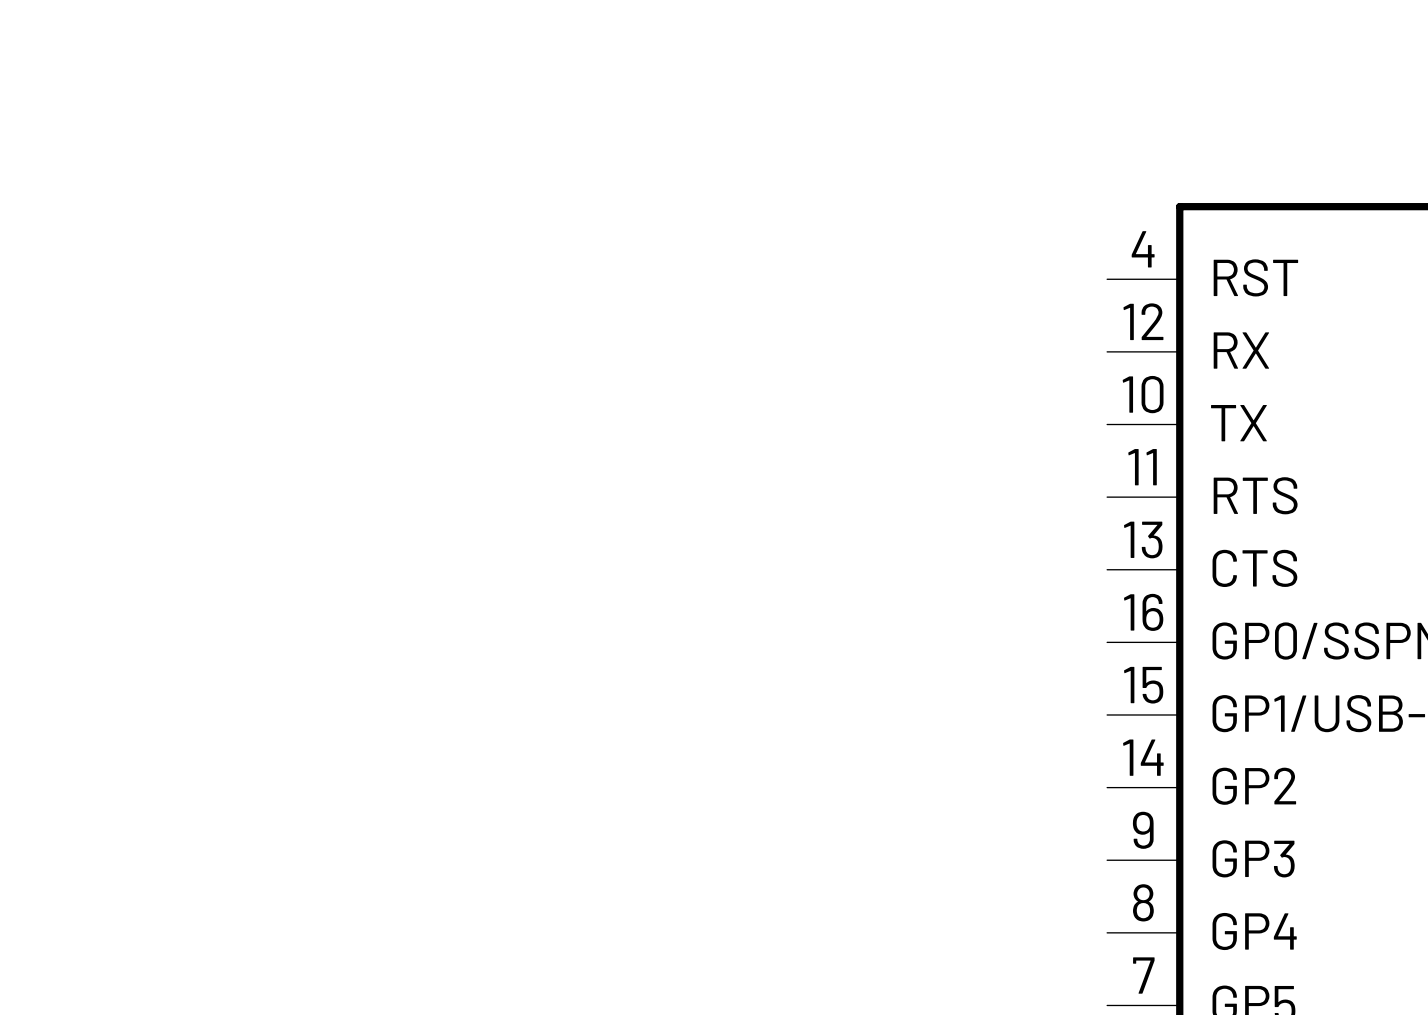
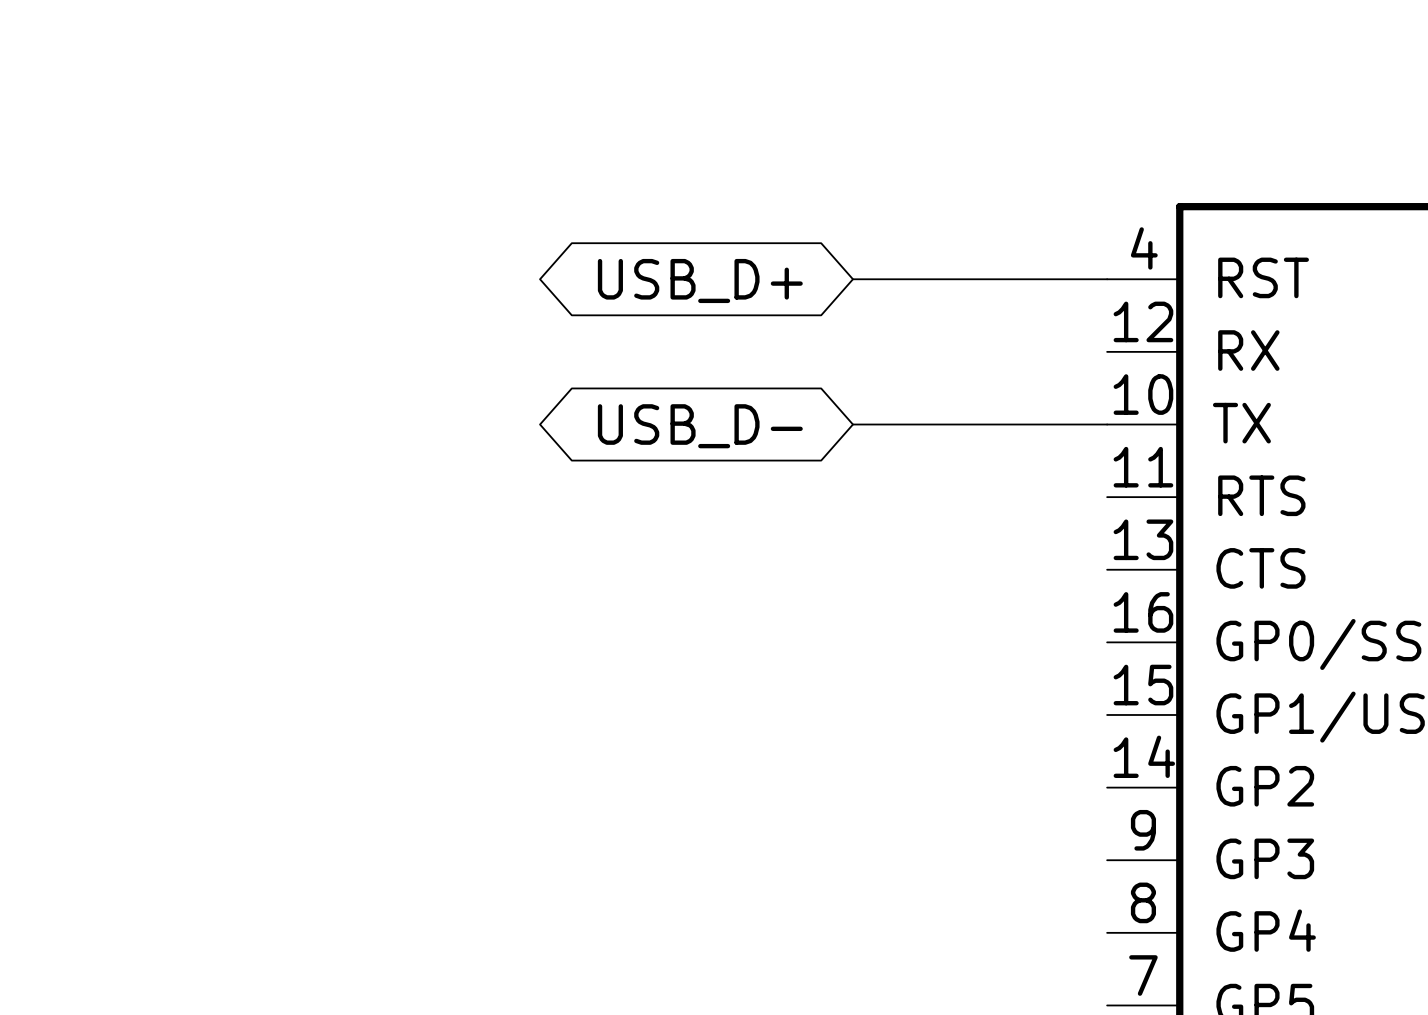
global label: none -> USB_D+ (700, 280)
wire: none -> (852, 279) (1107, 279)
global label: none -> USB_D- (700, 426)
wire: none -> (852, 424) (1107, 424)

